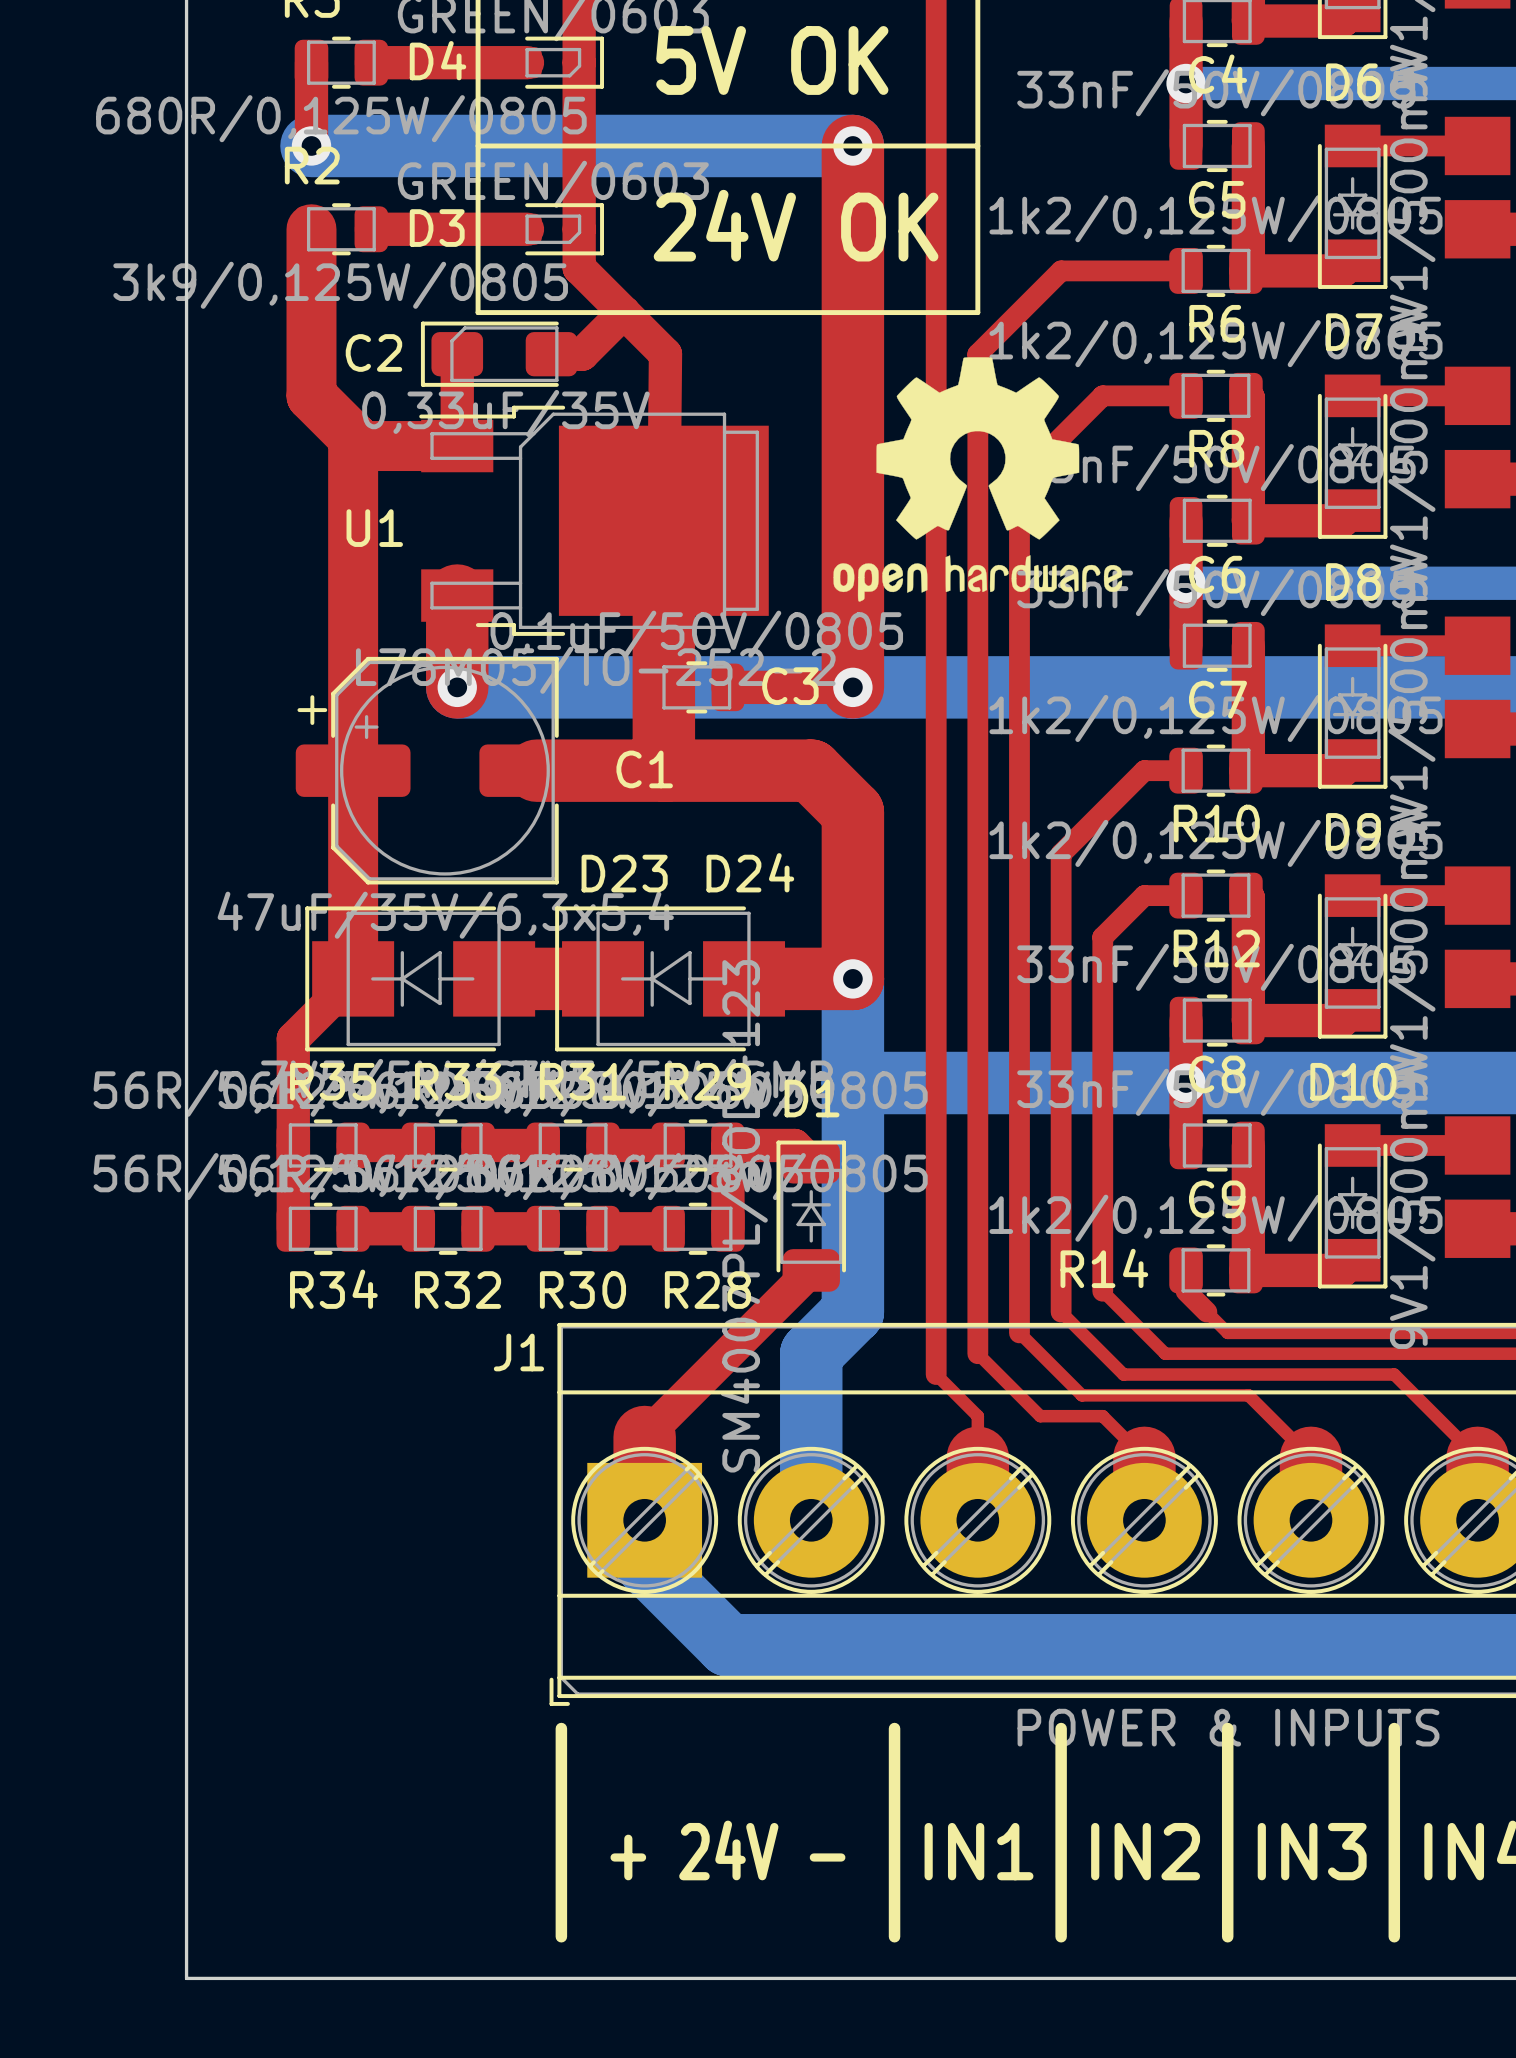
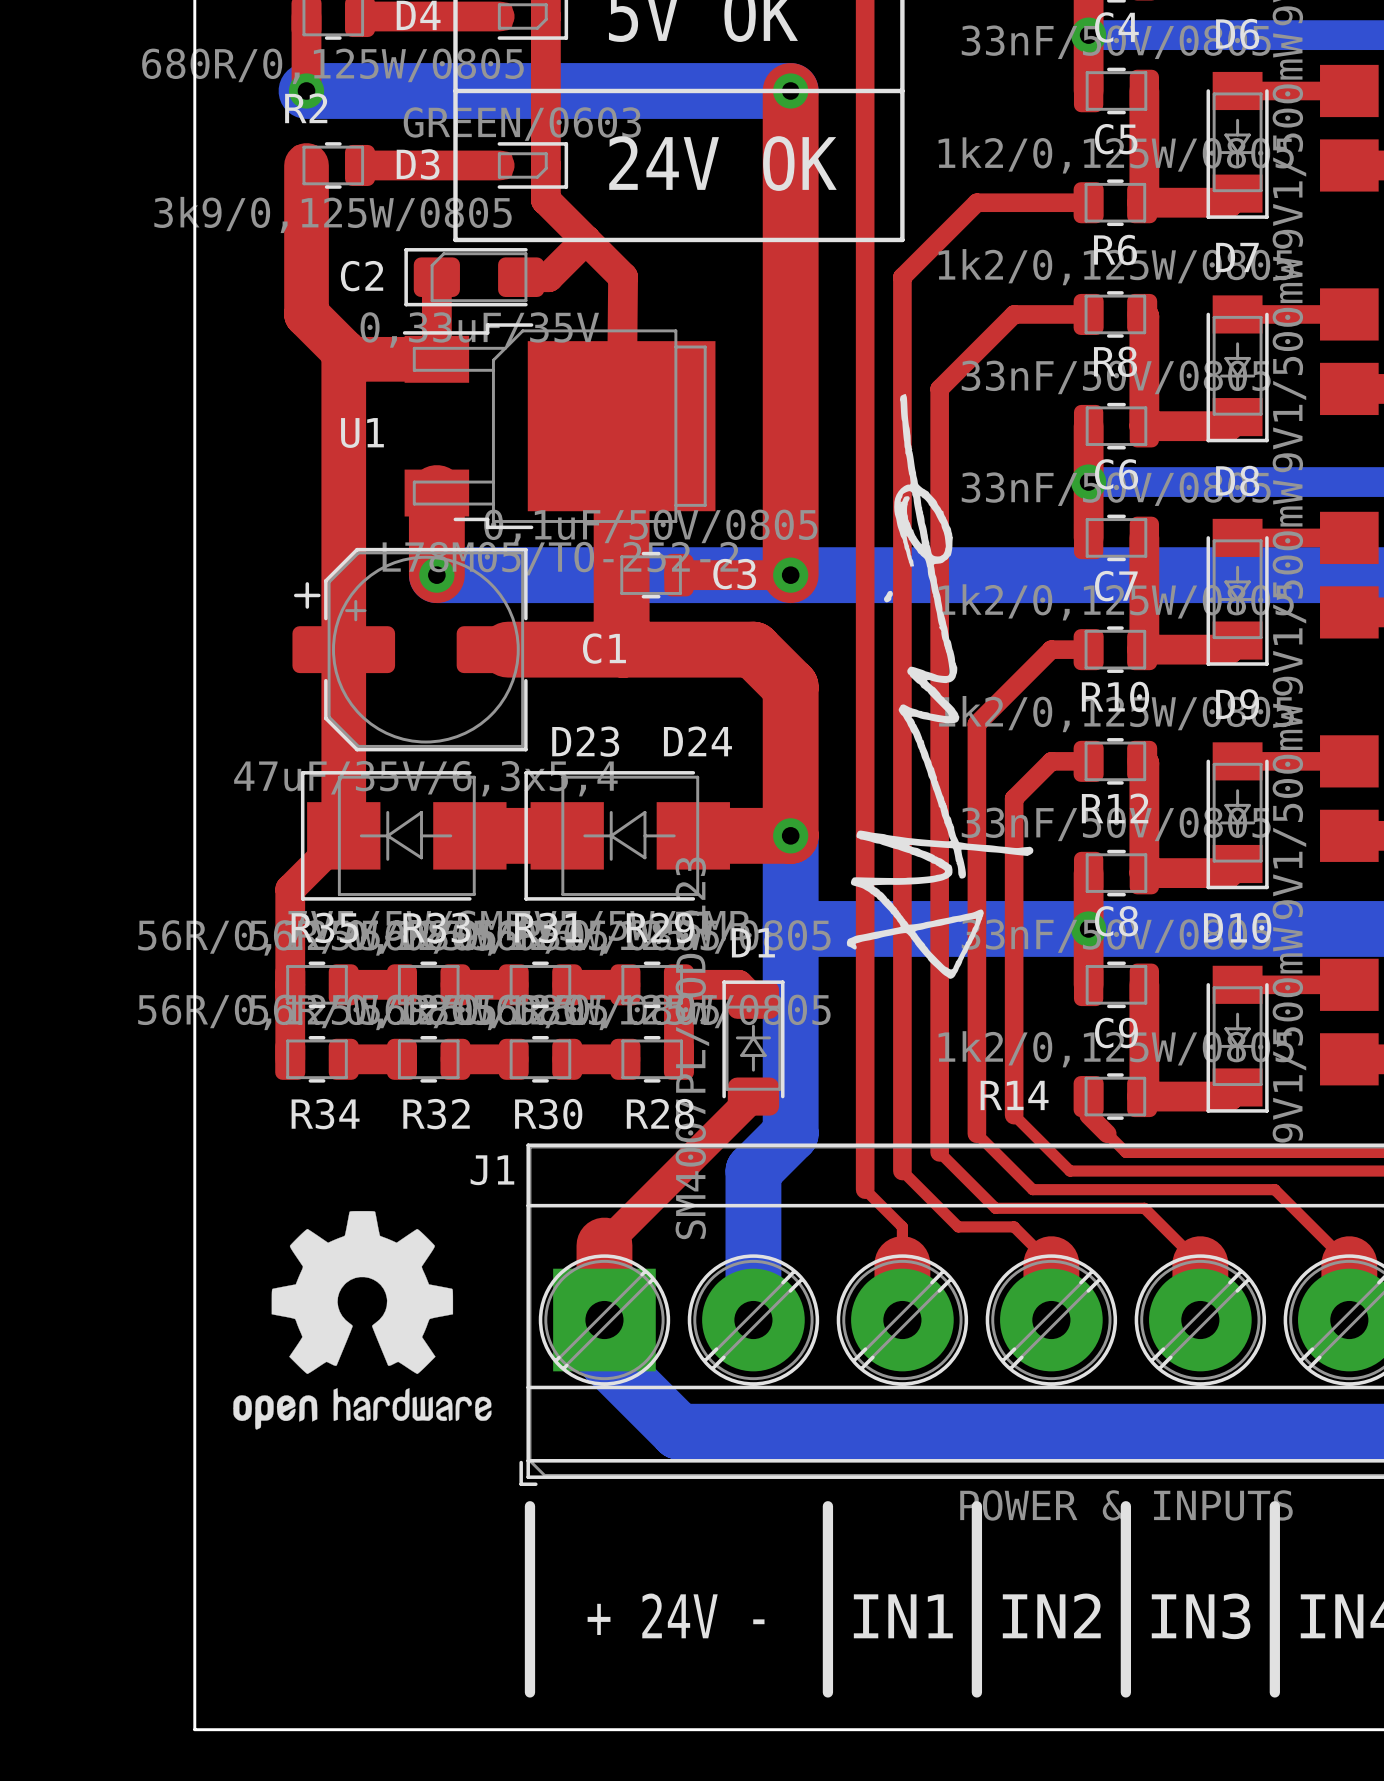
drawing: [833, 357, 1123, 602] -> none
drawing: none -> [846, 394, 1034, 979]
drawing: none -> [233, 1211, 492, 1430]

